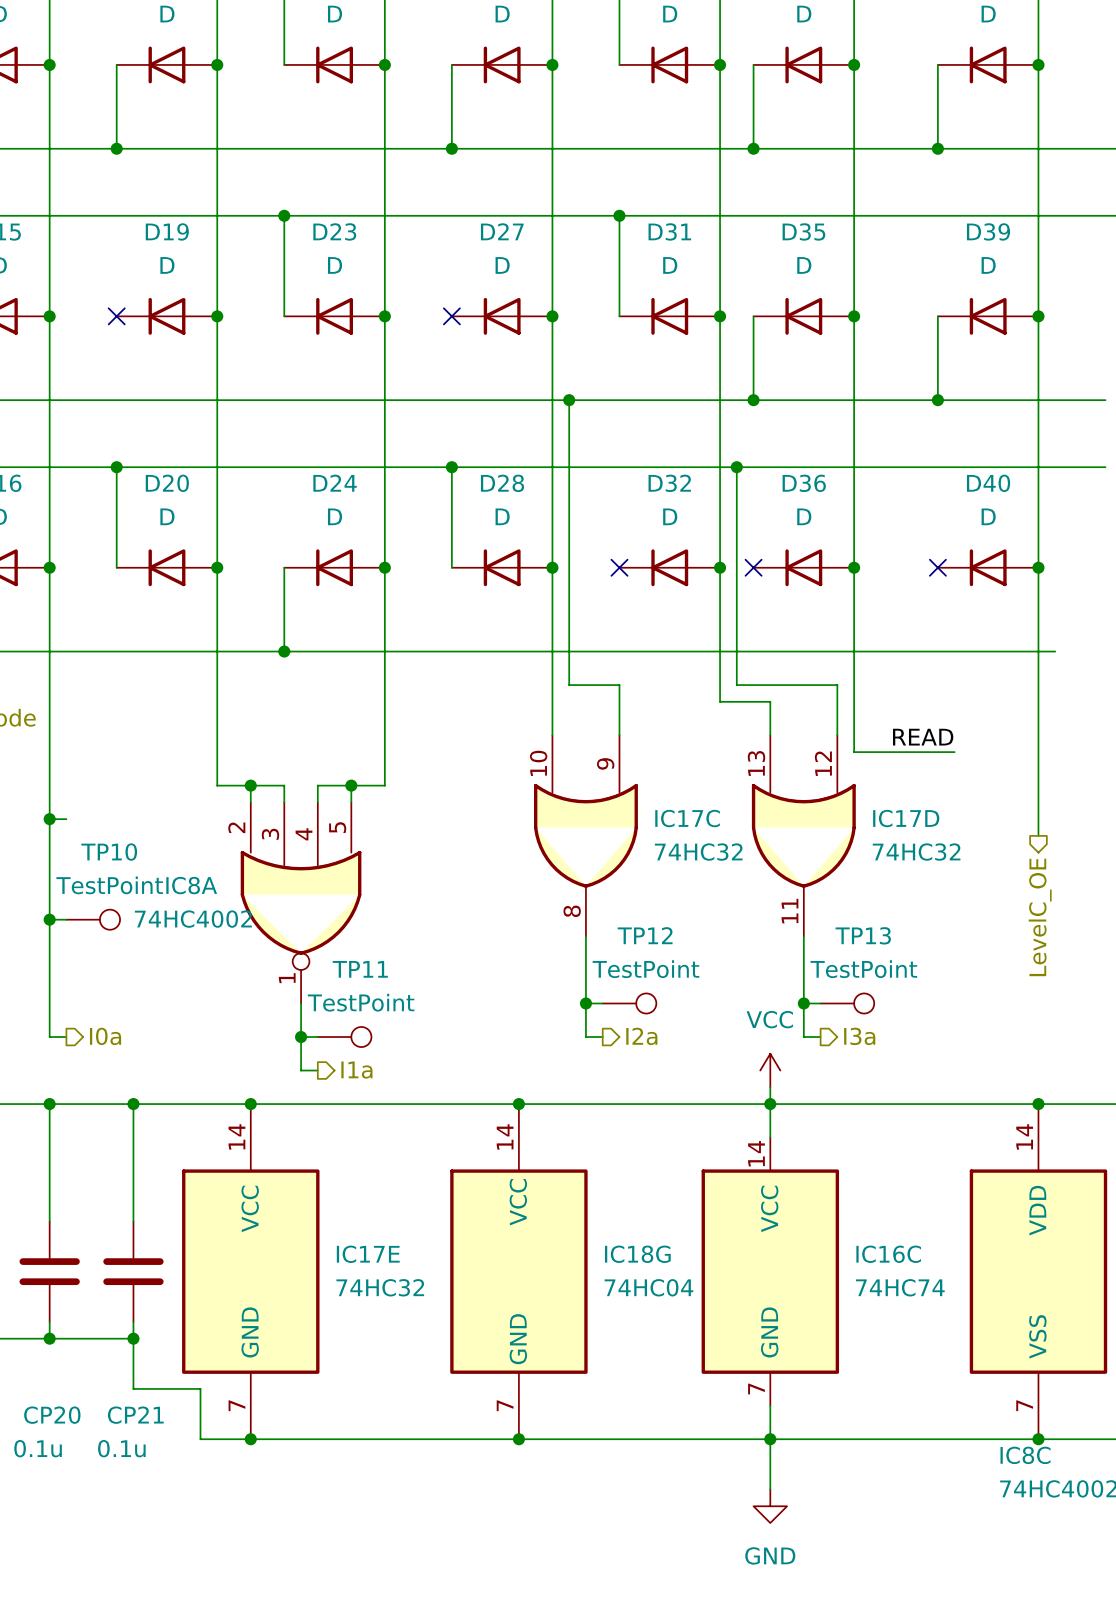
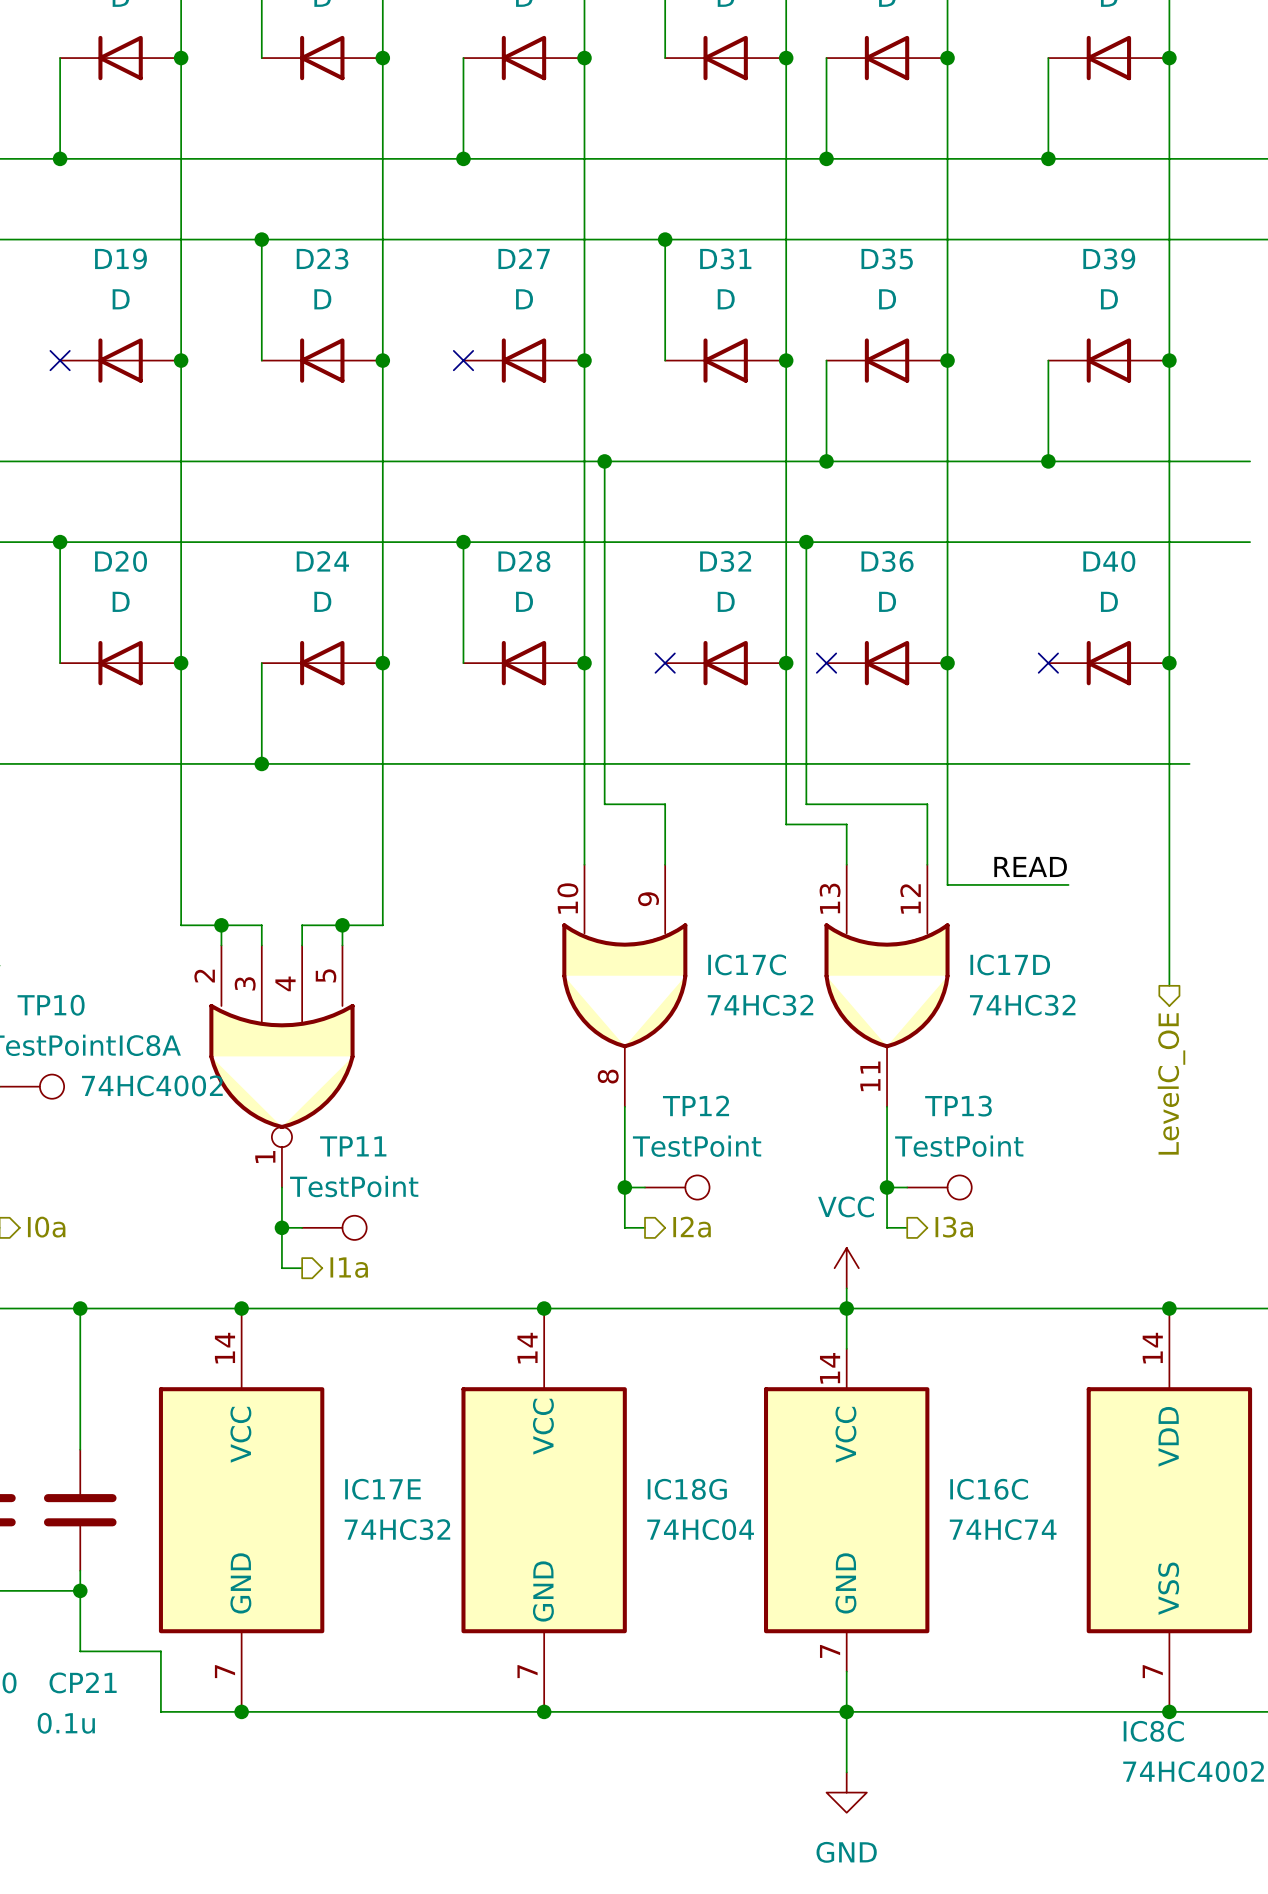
junction position: (250, 1104) -> (241, 1308)
IC17E position: (250, 1271) -> (241, 1510)
junction position: (250, 1439) -> (241, 1711)

